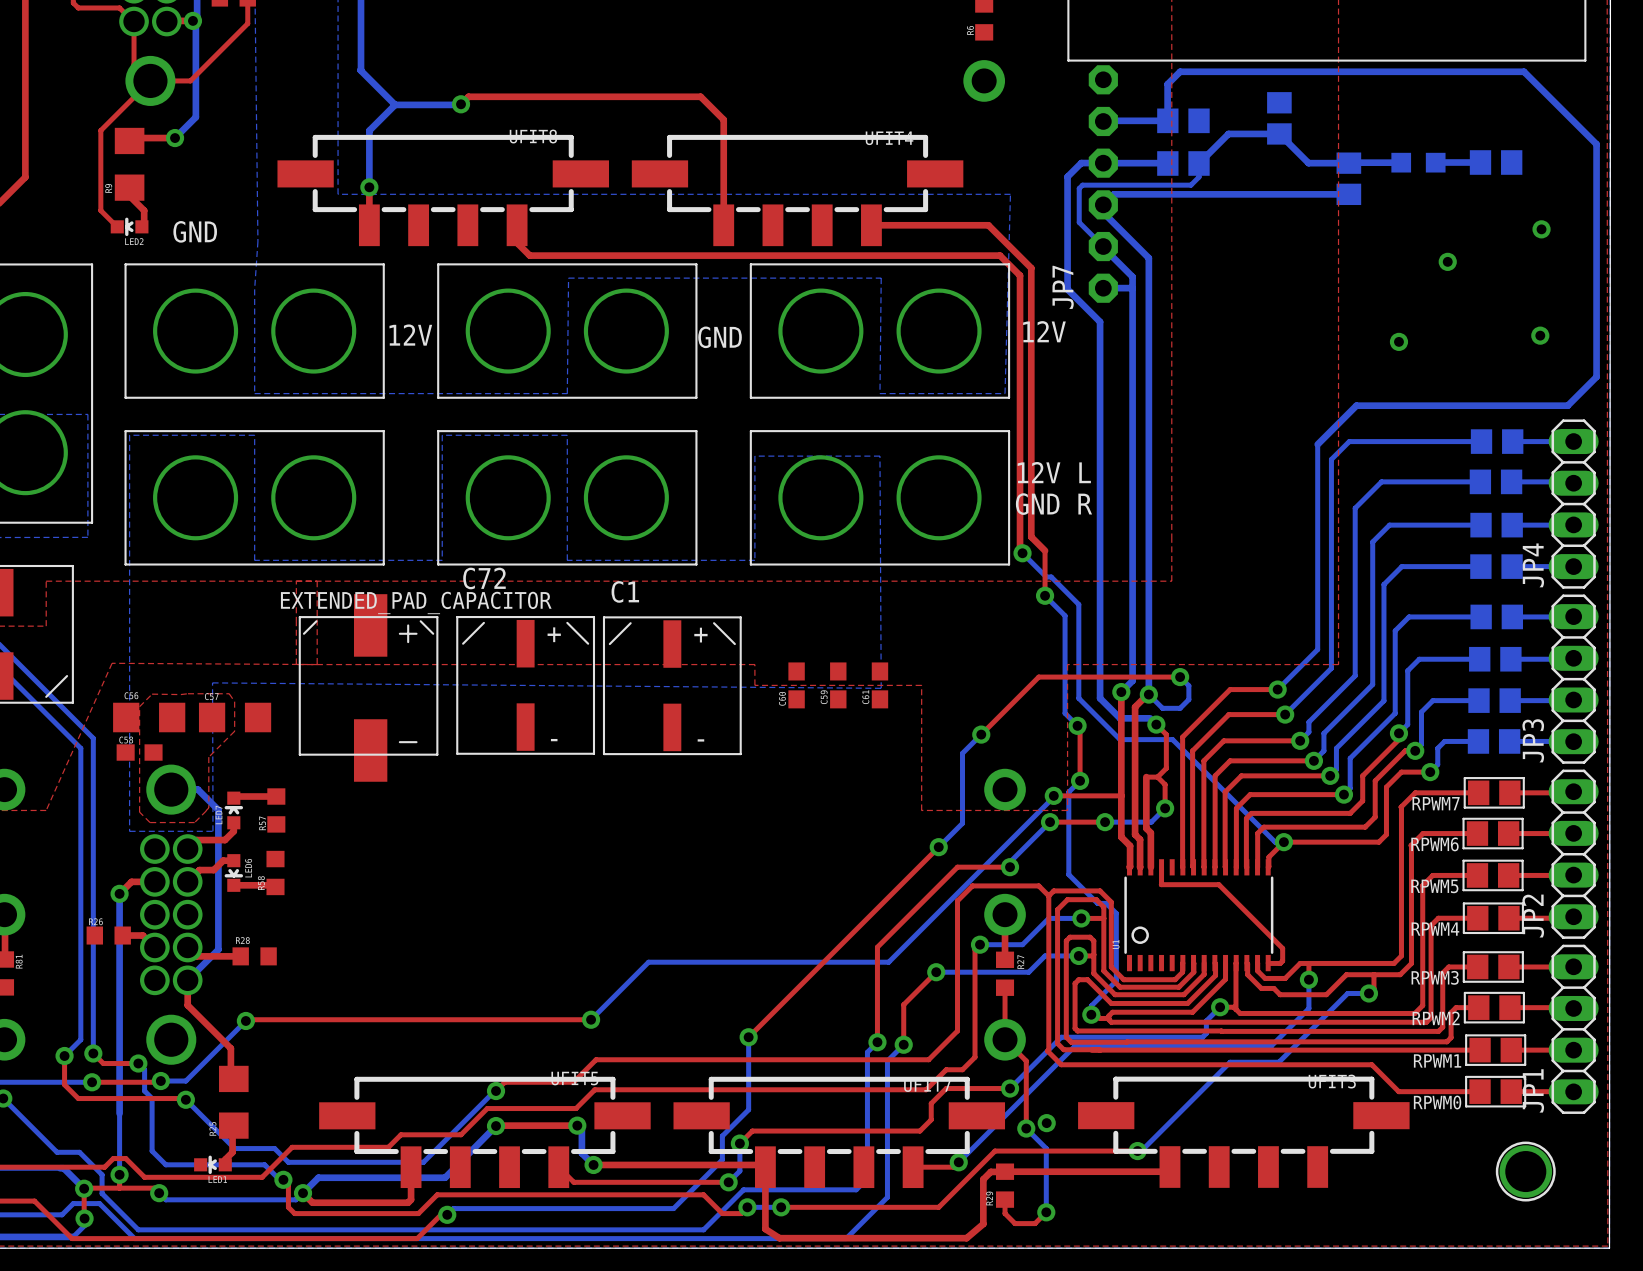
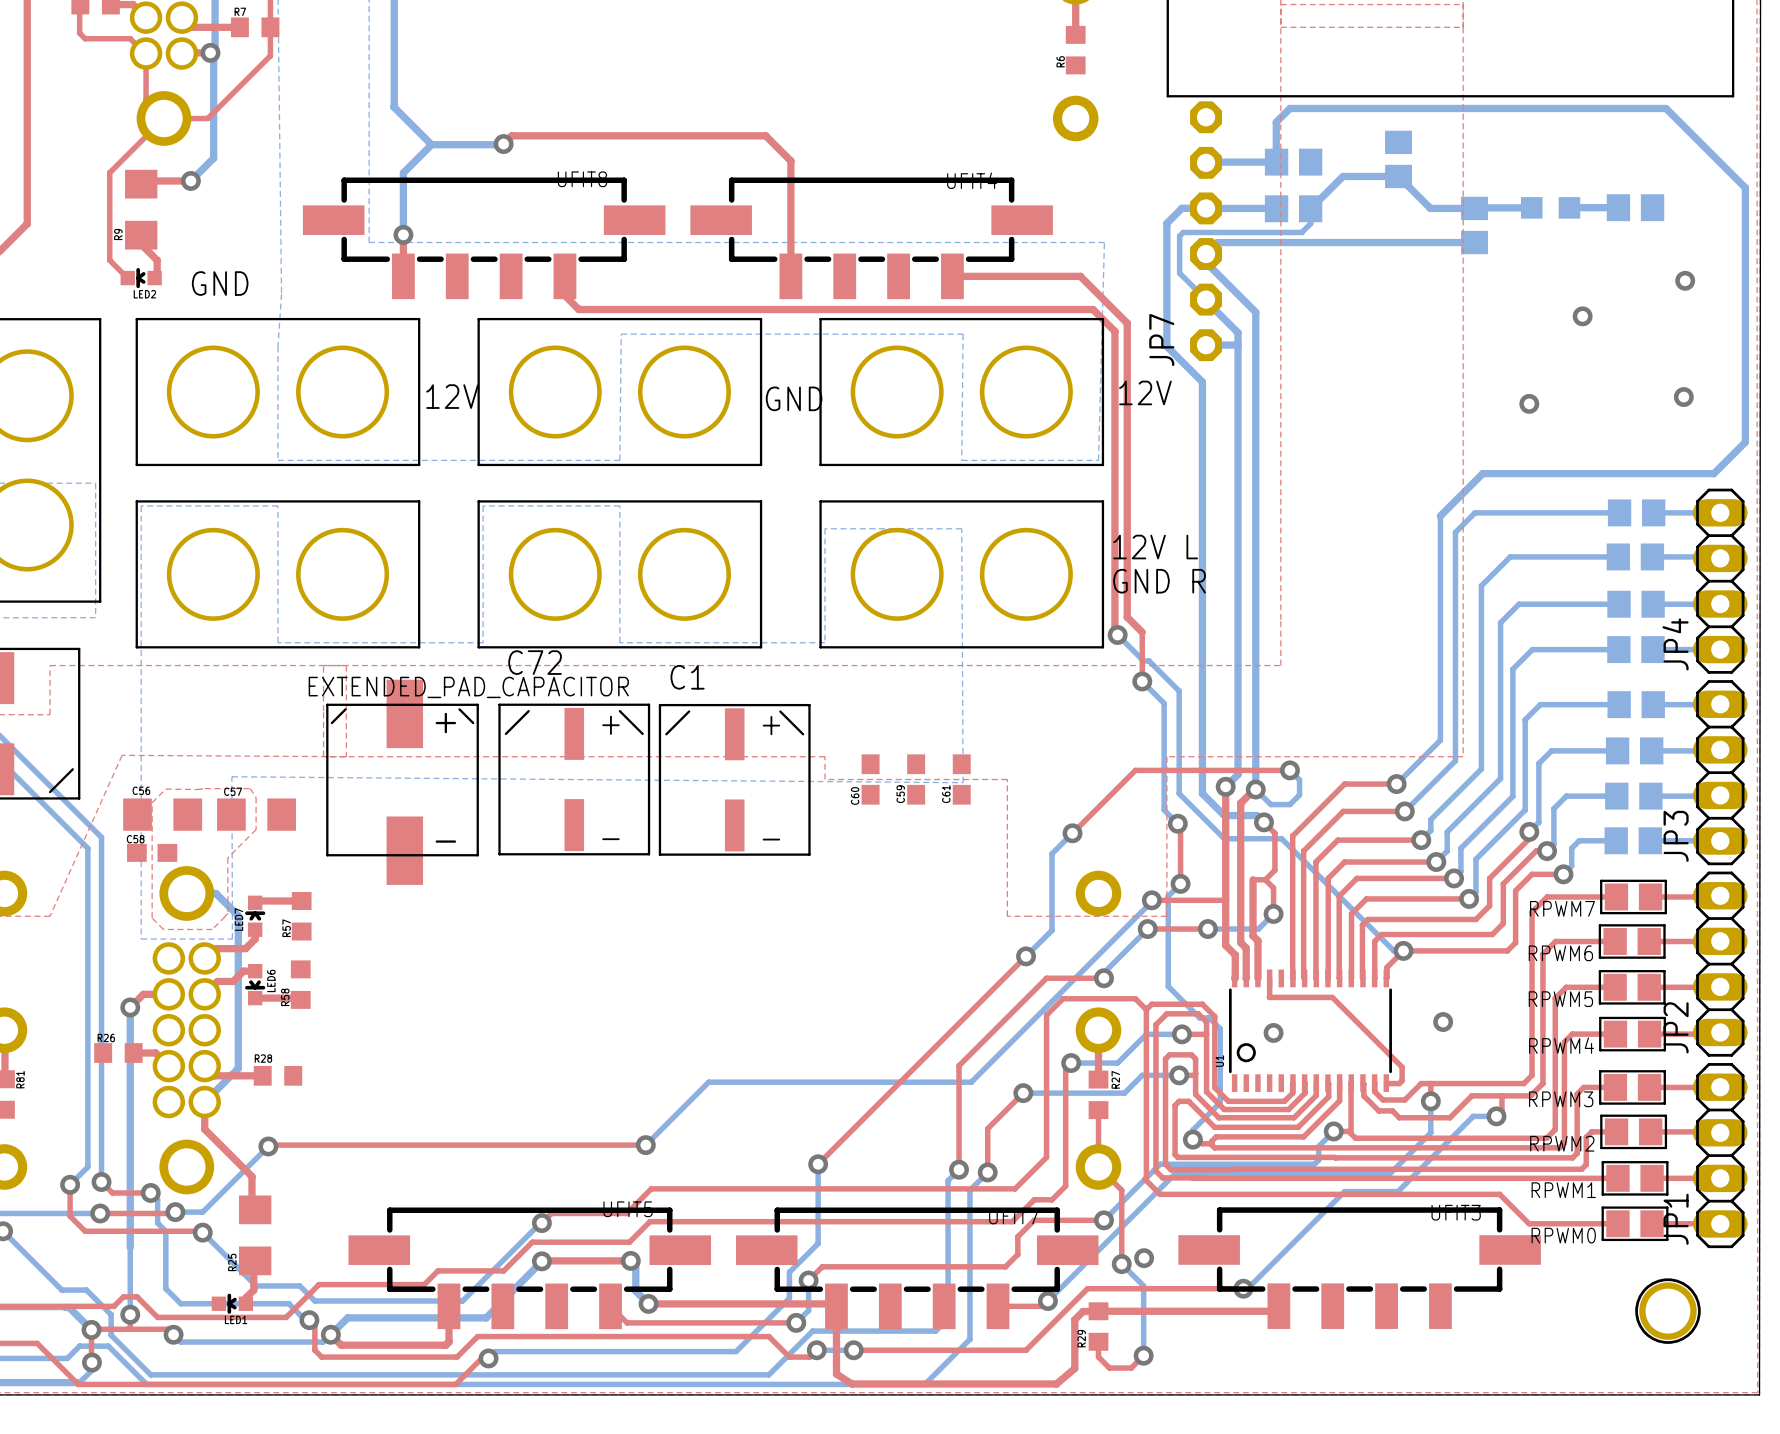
via: none -> (1443, 1022)
via: none -> (1273, 1032)

